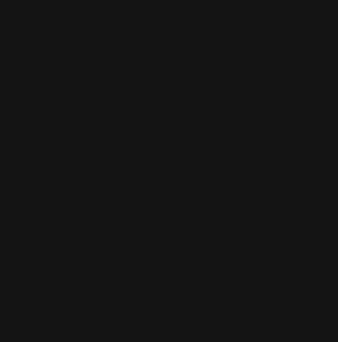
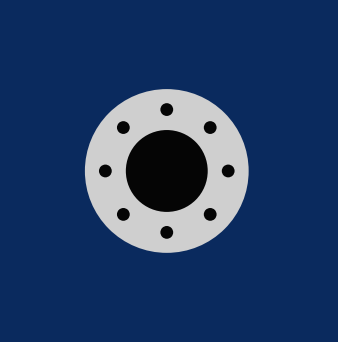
part: none -> (166, 170)

